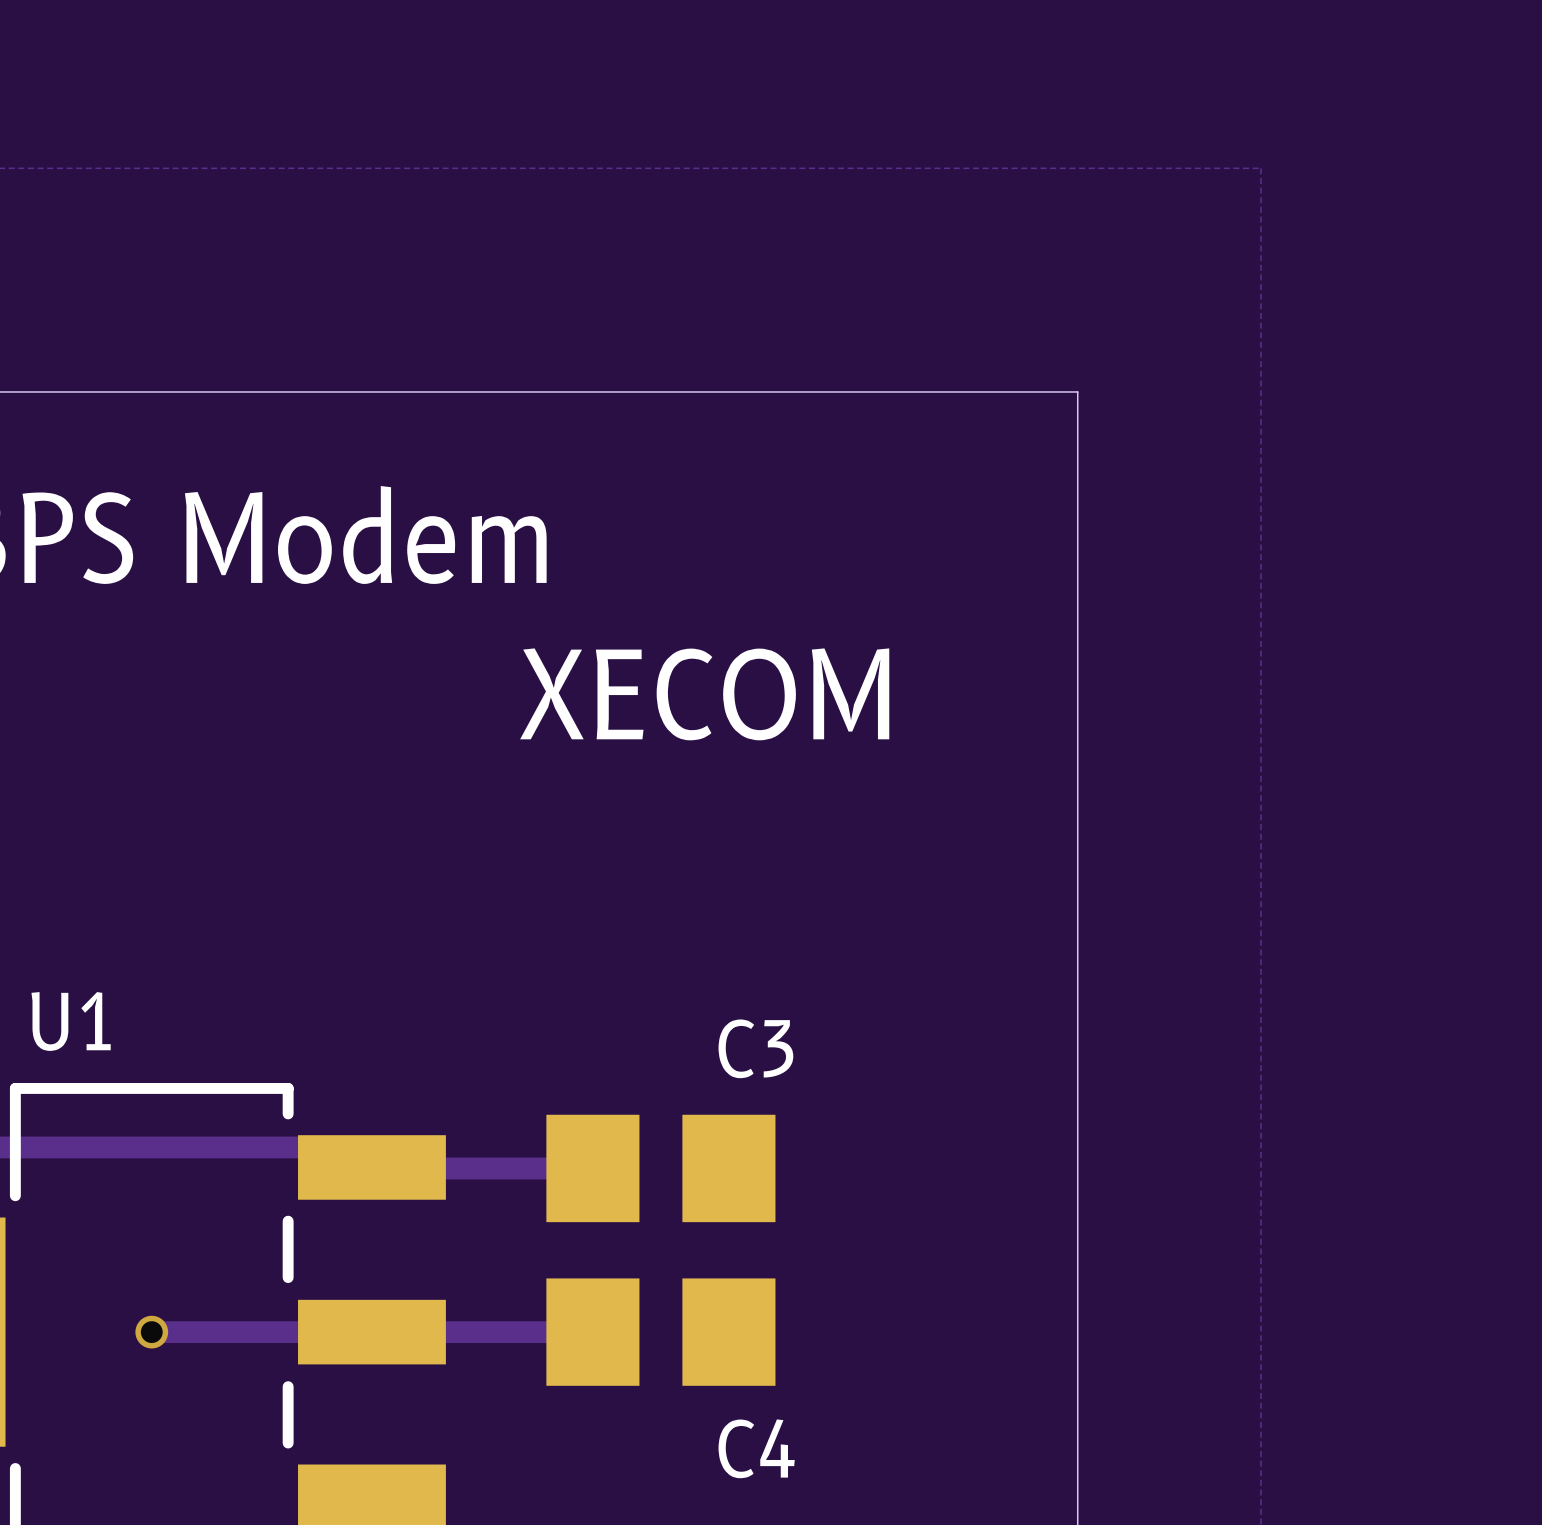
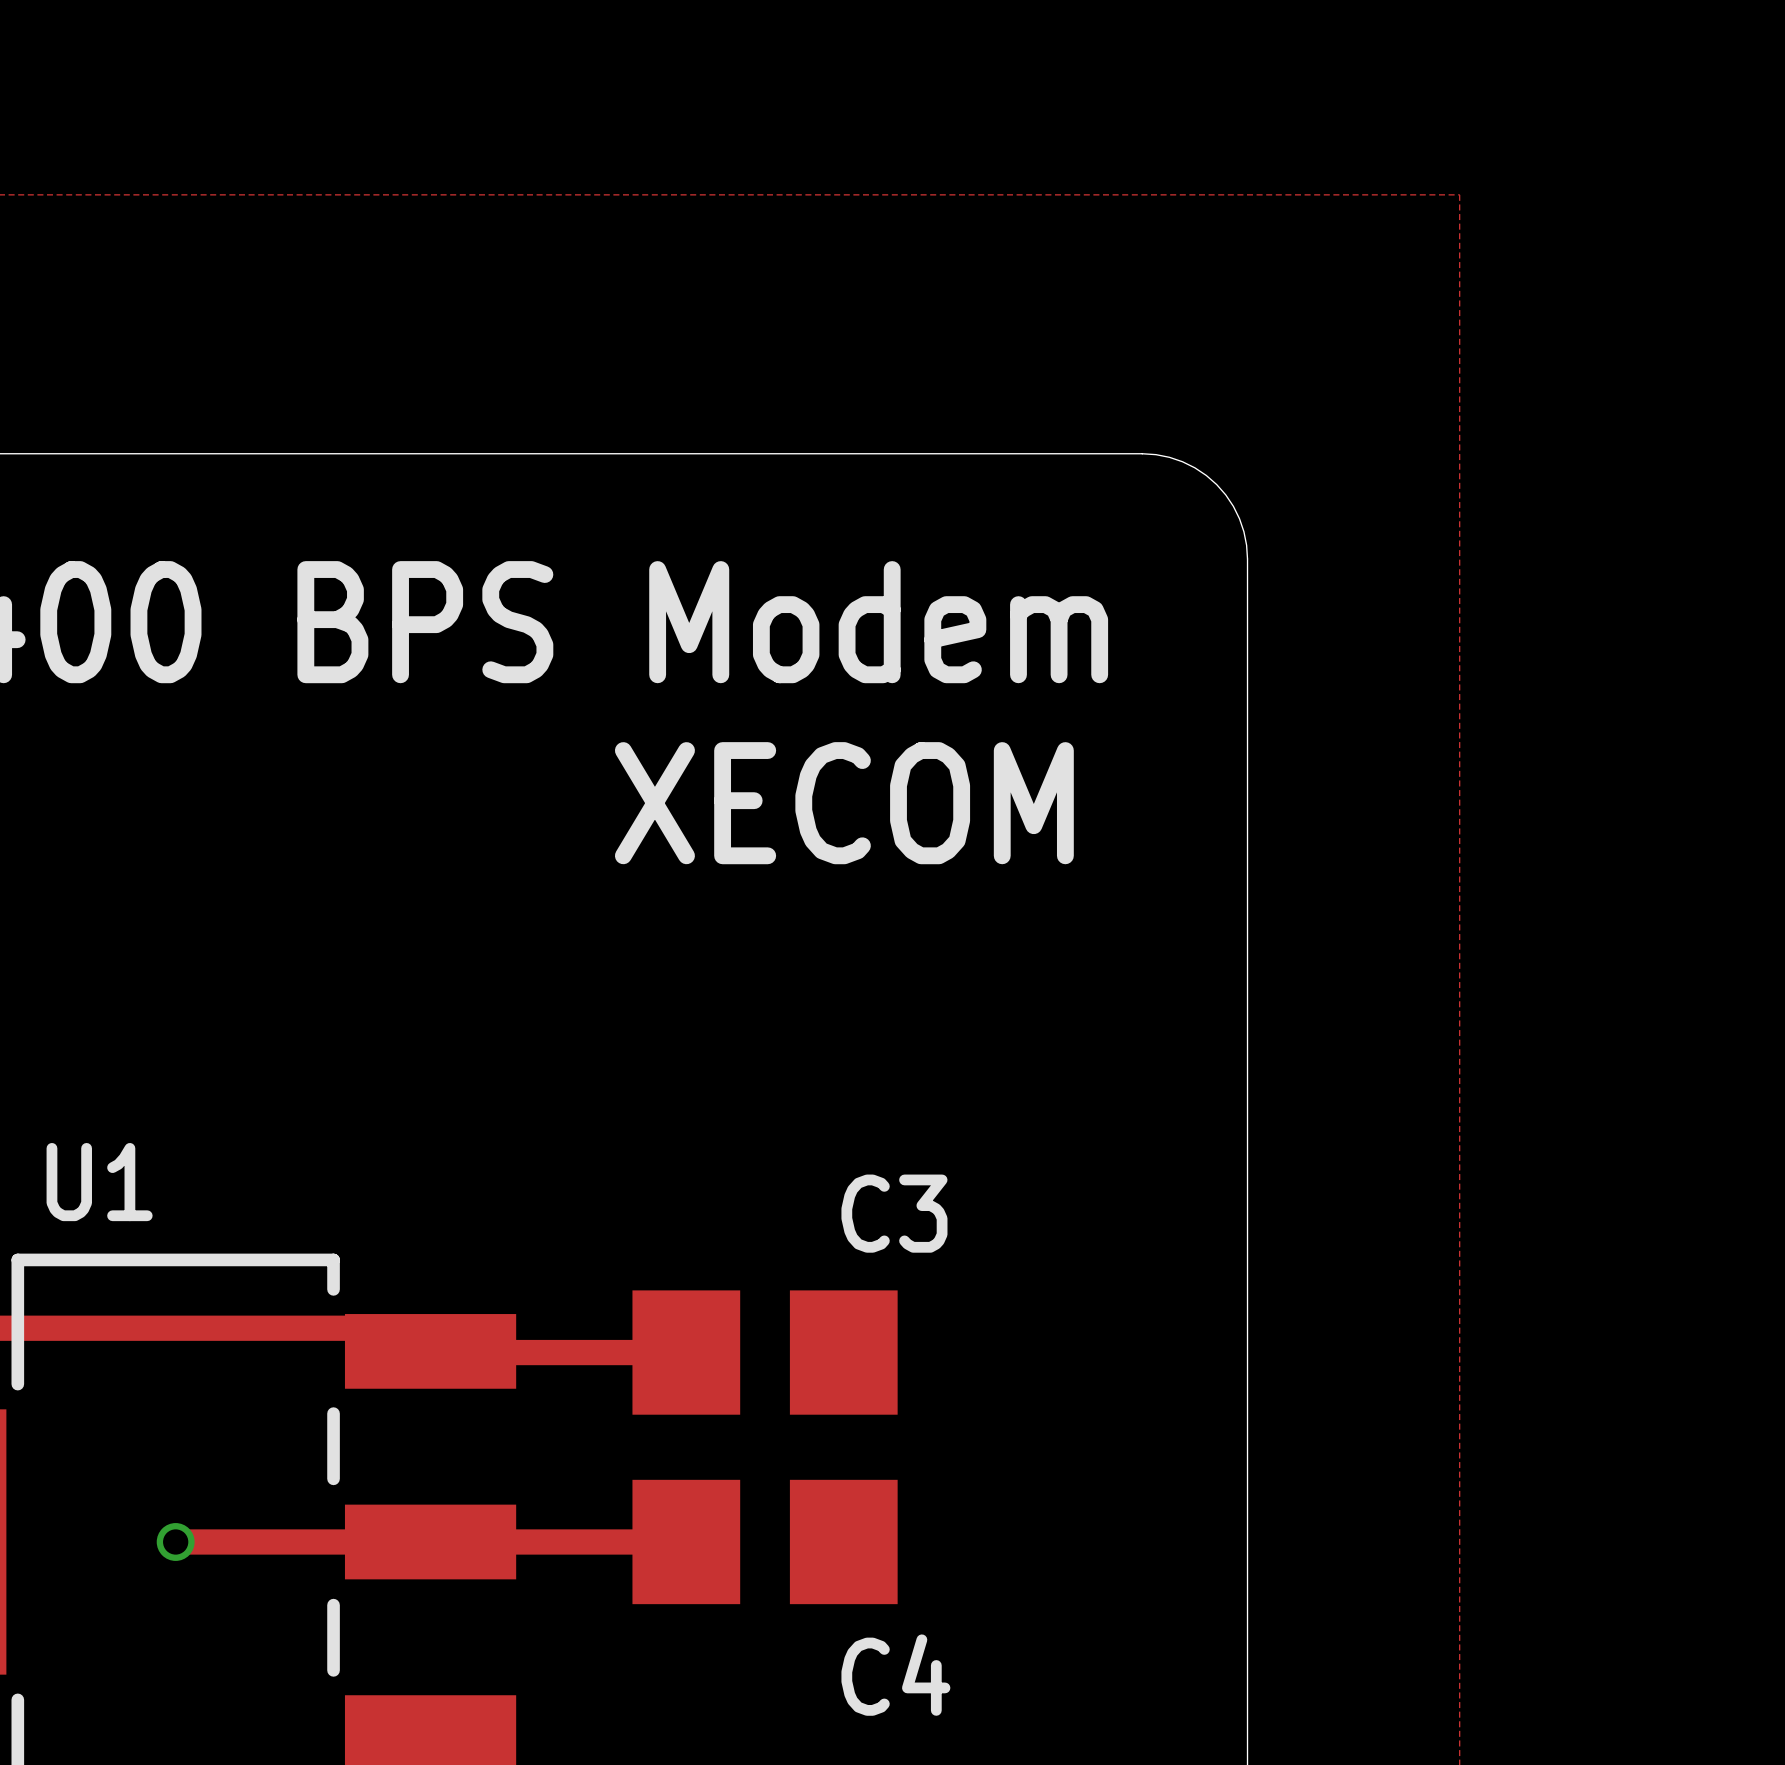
board edge: (986, 391) (1077, 391) (1077, 482) -> (1142, 453) (1169, 457) (1182, 461) (1194, 467) (1216, 484) (1233, 506) (1239, 518) (1243, 531) (1247, 558)

